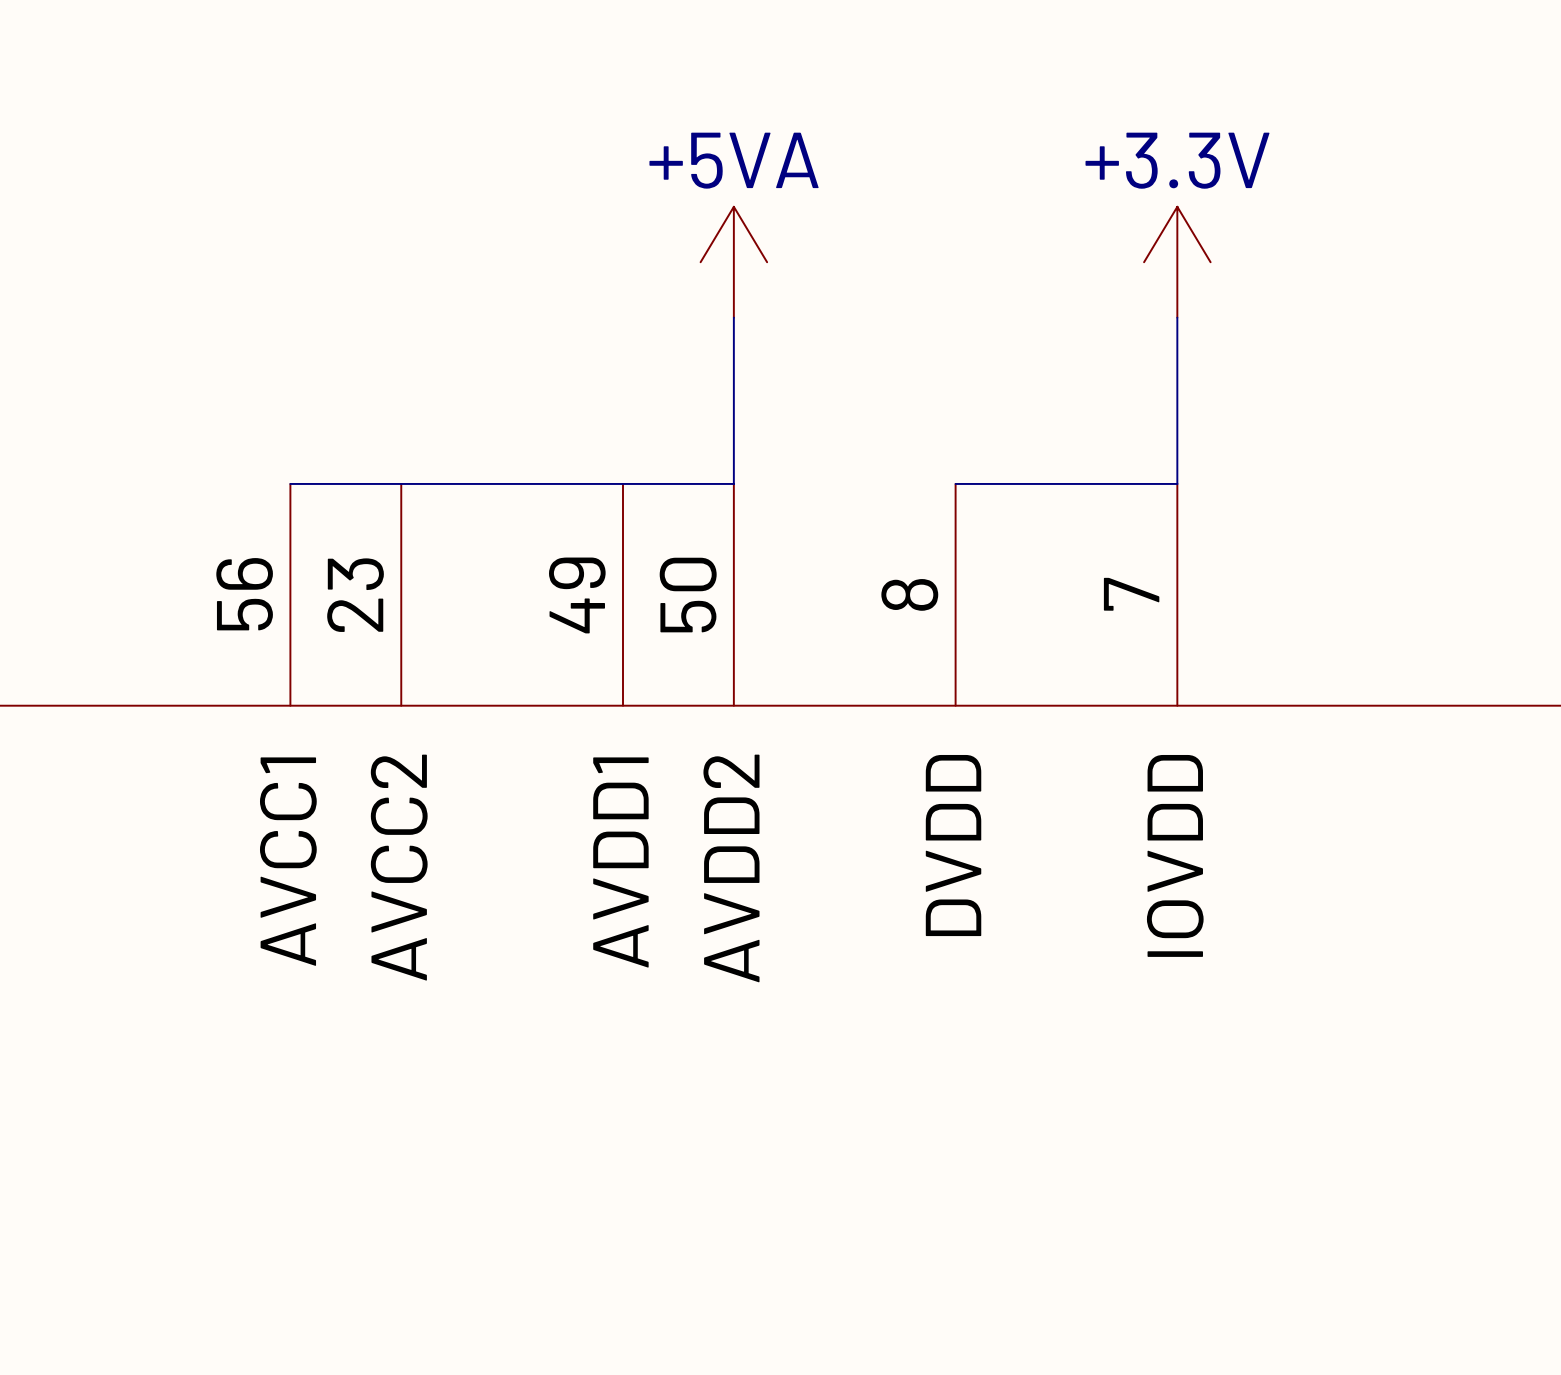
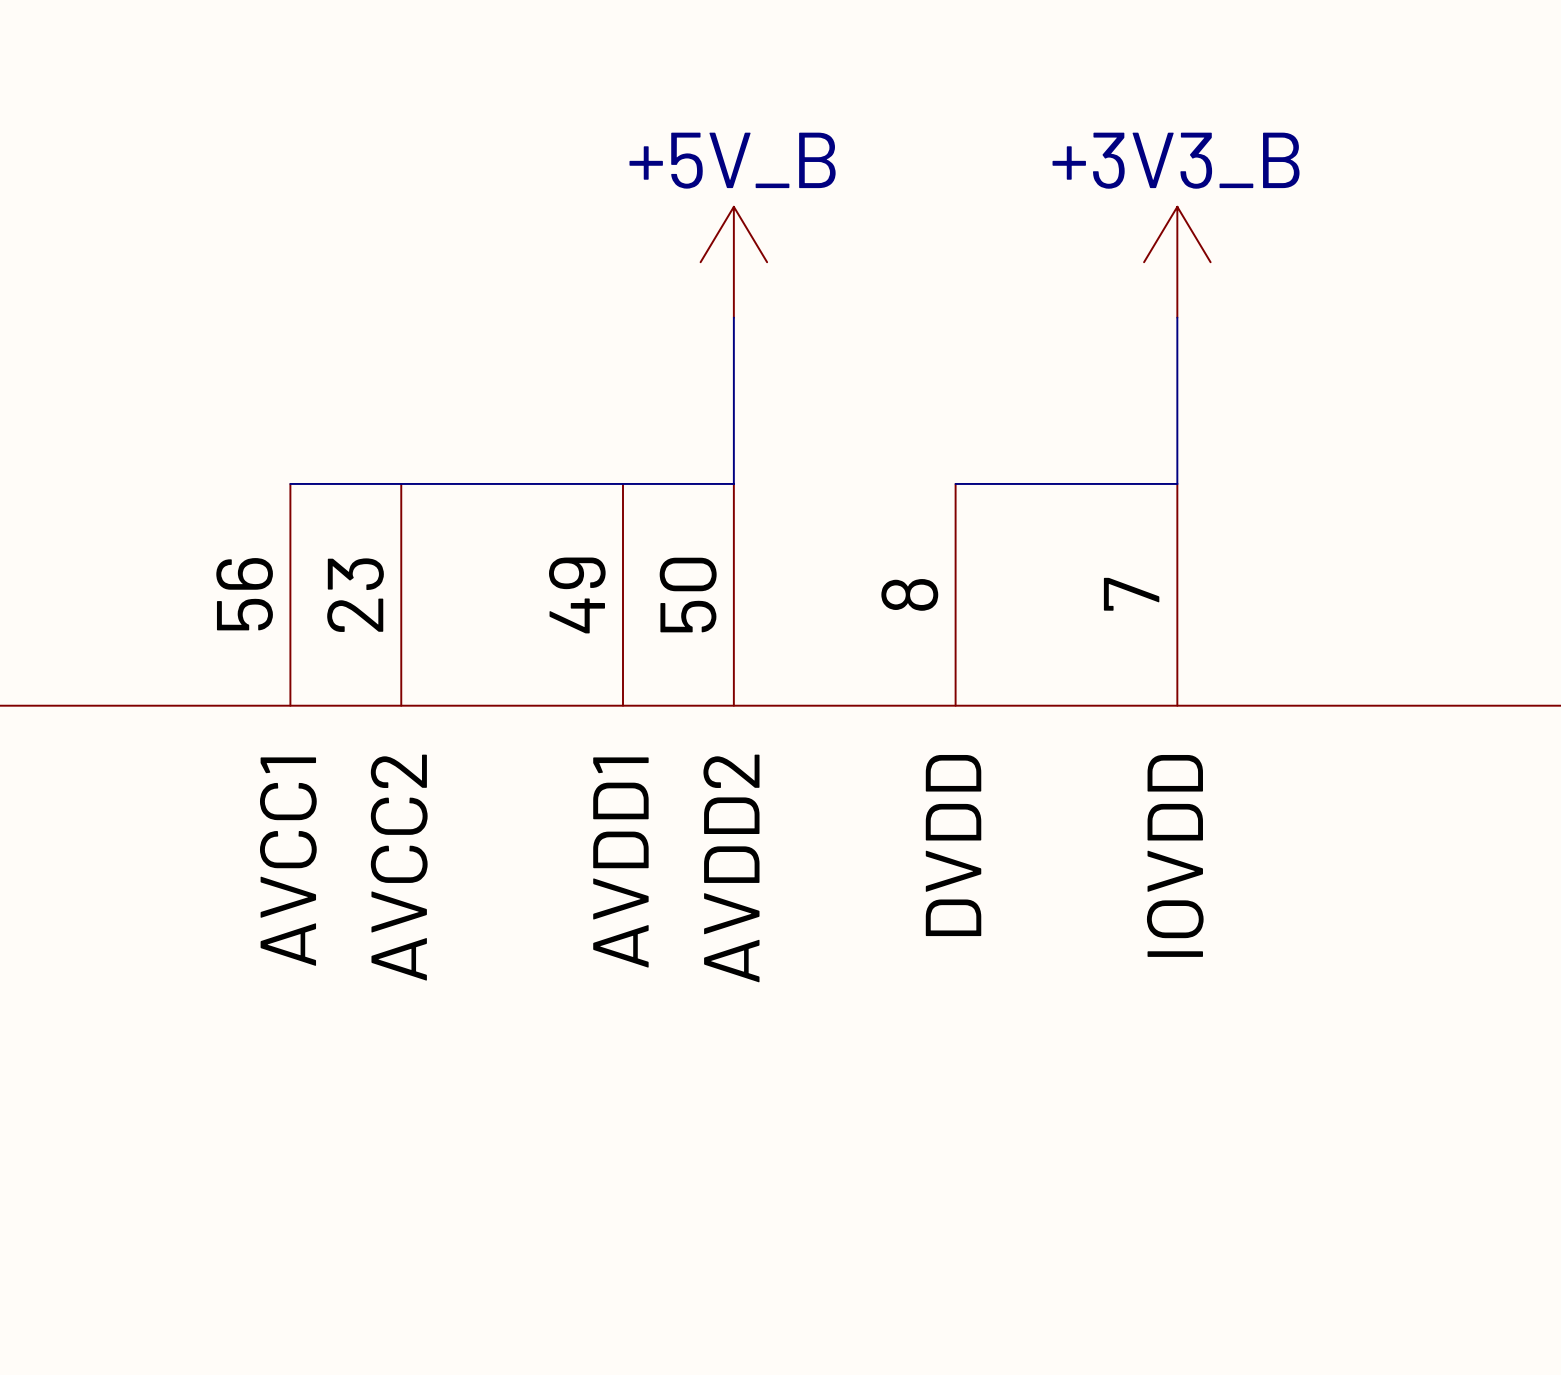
power symbol: +5VA (733, 262) -> +5V_B (733, 262)
power symbol: +3.3V (1177, 262) -> +3V3_B (1177, 262)

